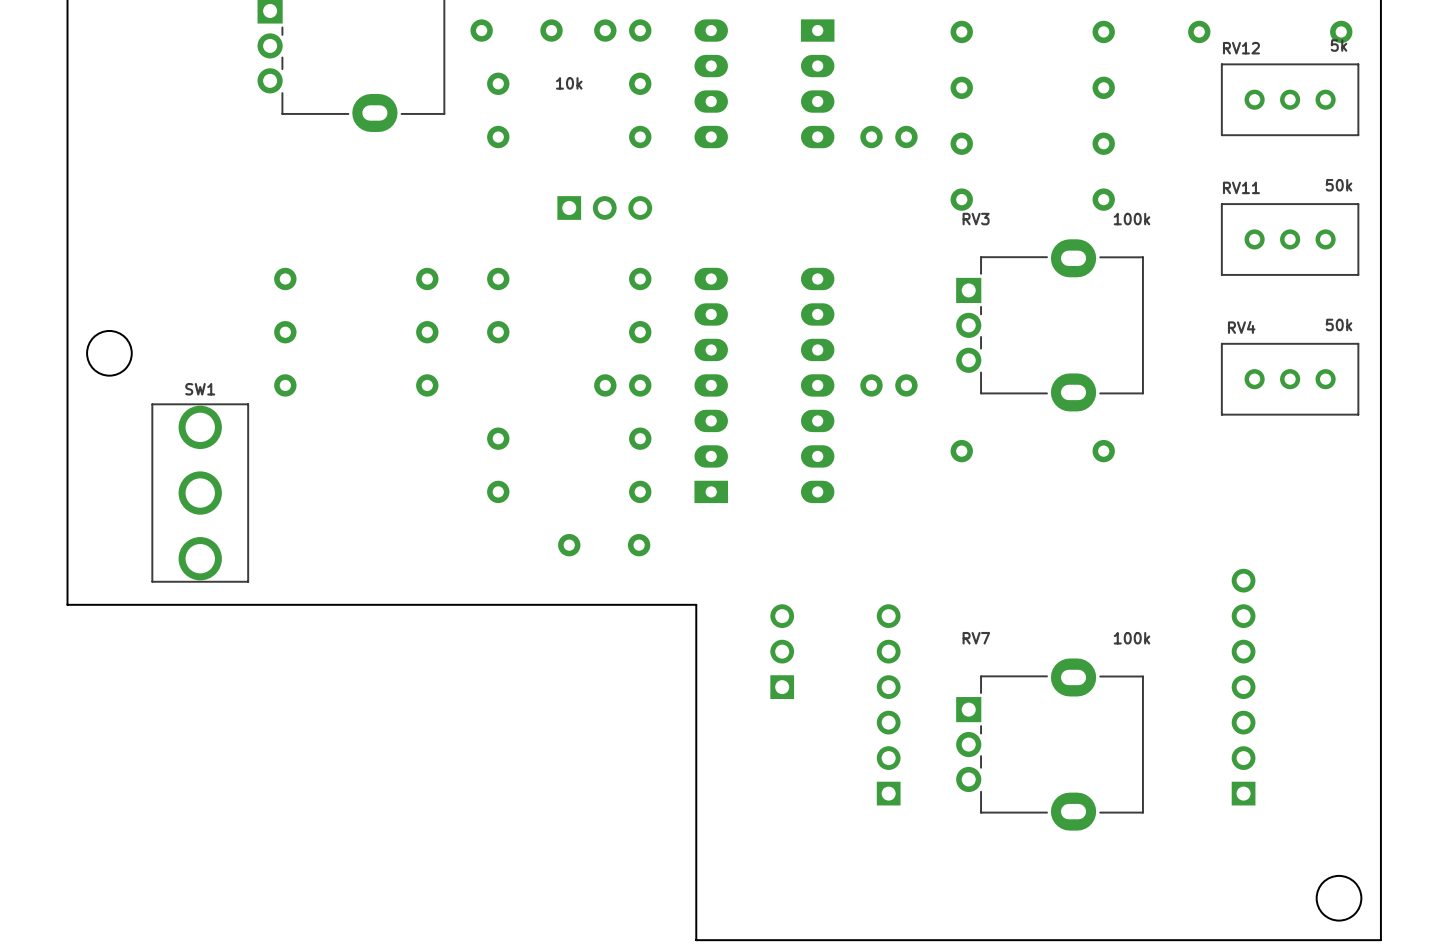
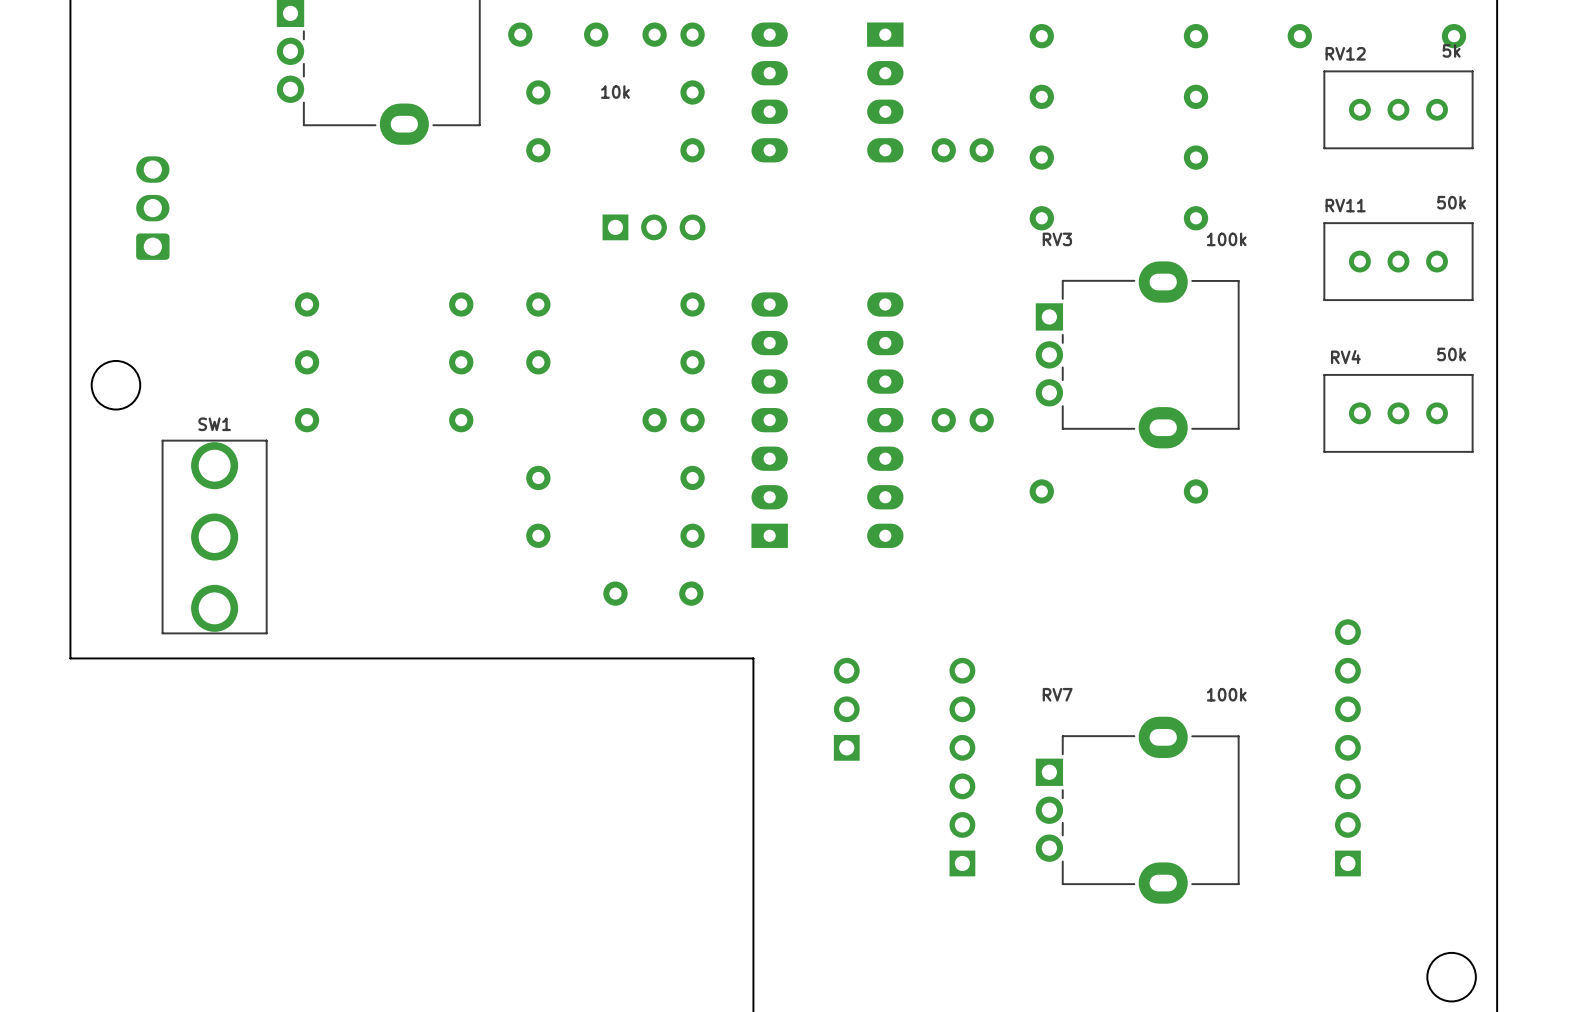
part: none -> (152, 208)

